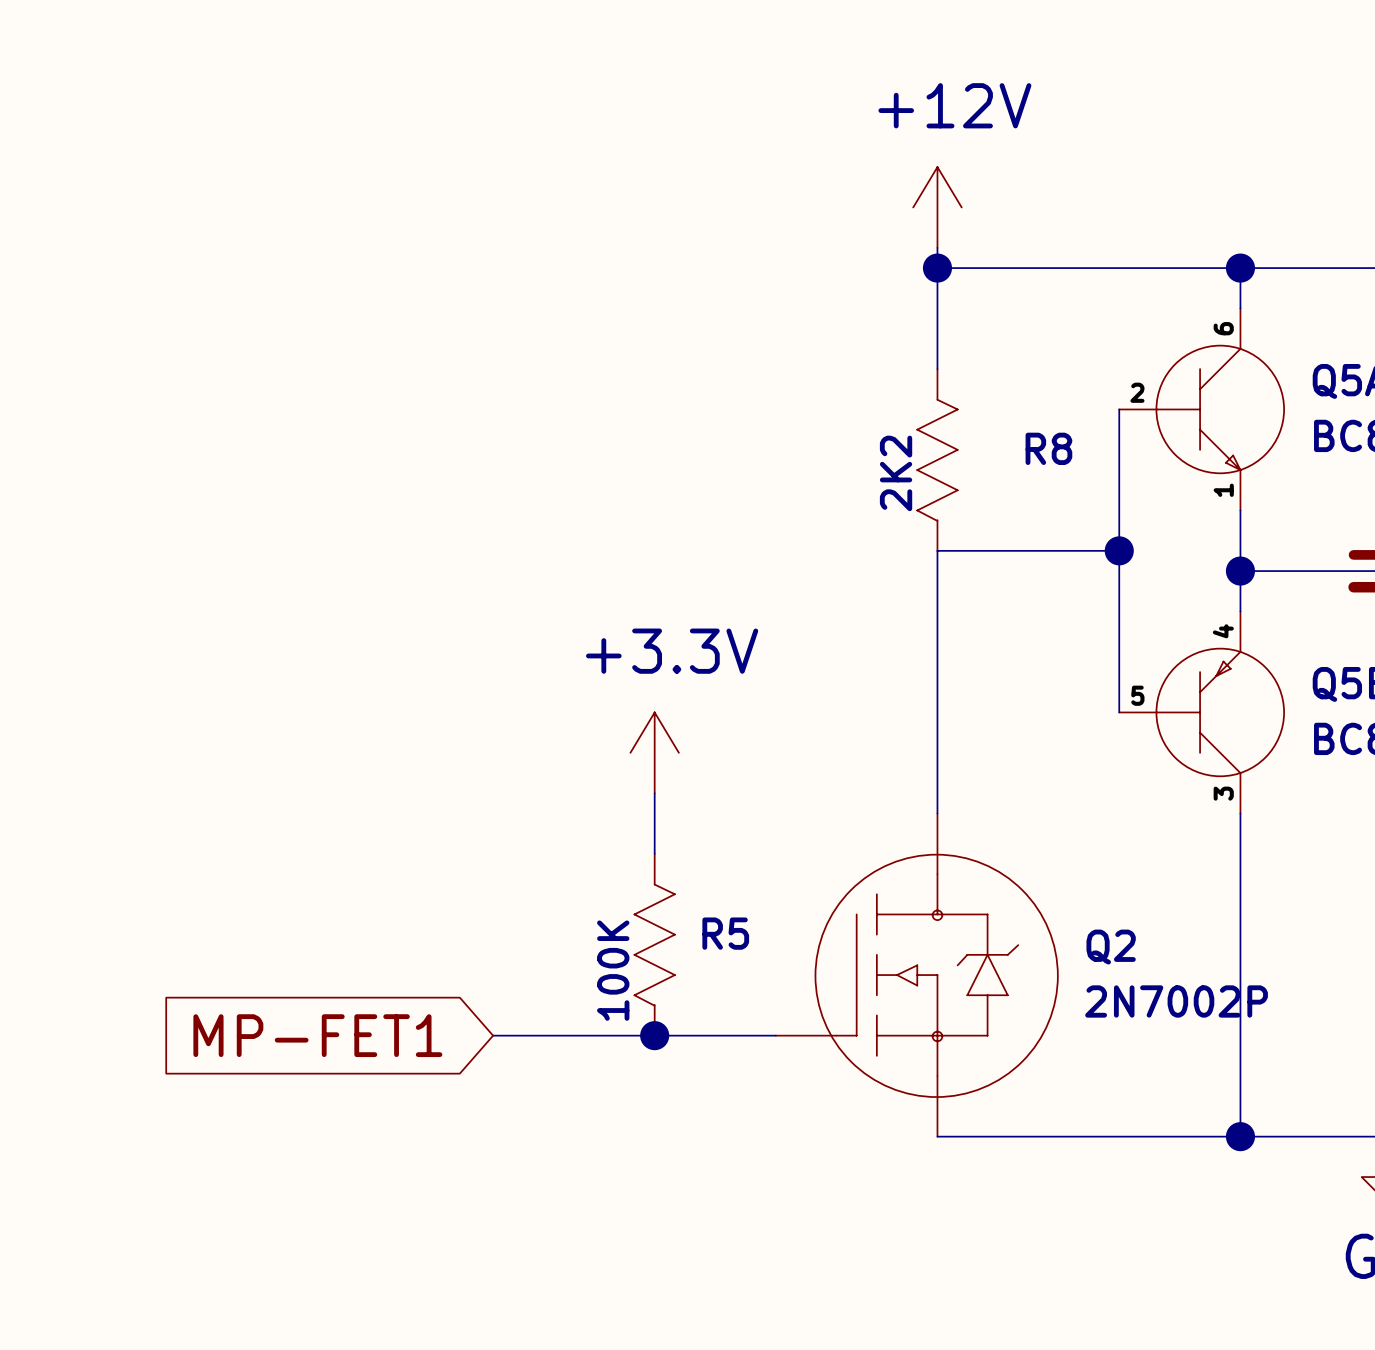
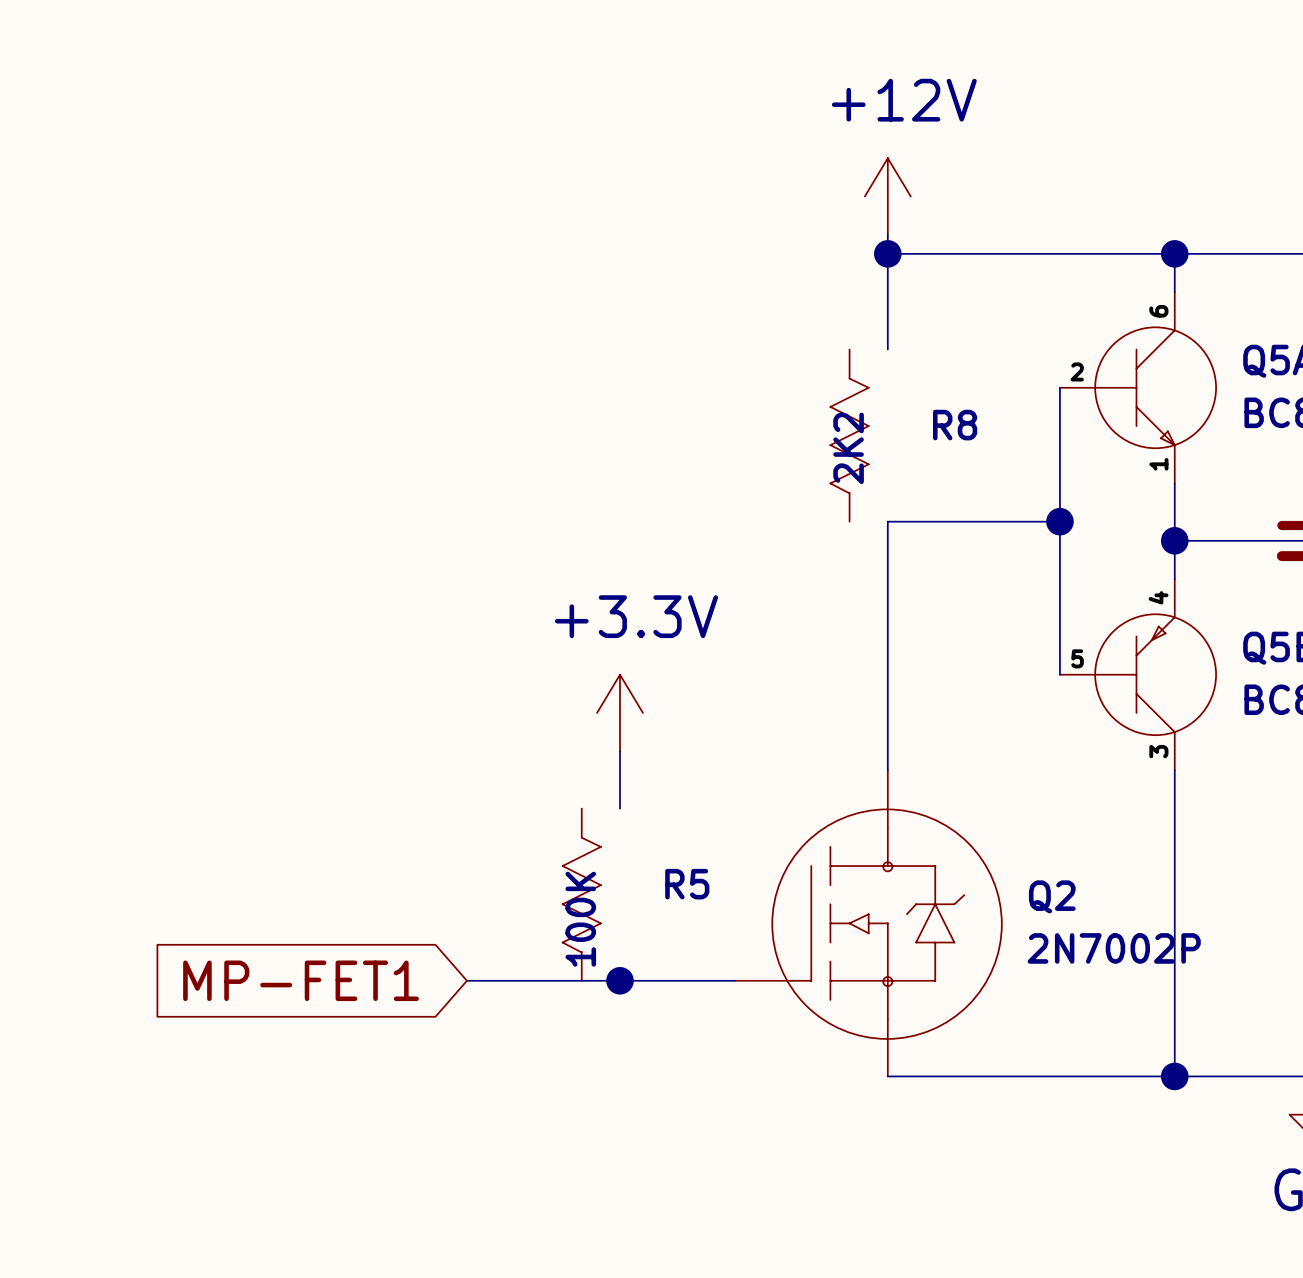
R8 position: (937, 459) -> (849, 435)
R5 position: (654, 944) -> (581, 894)

